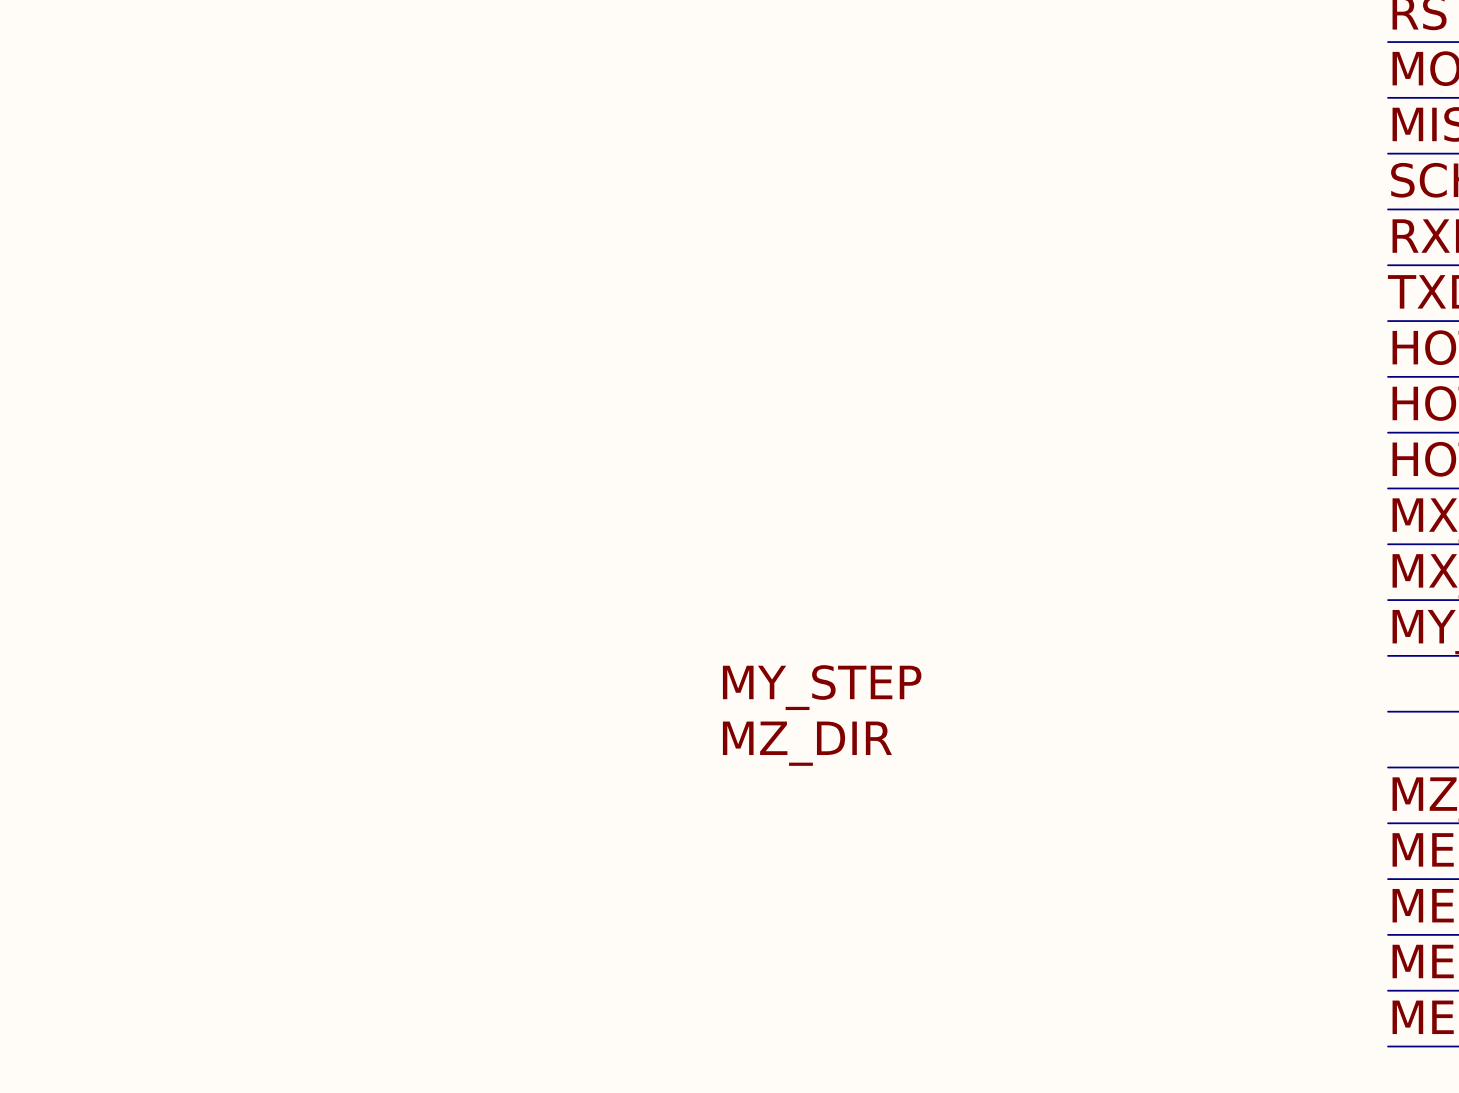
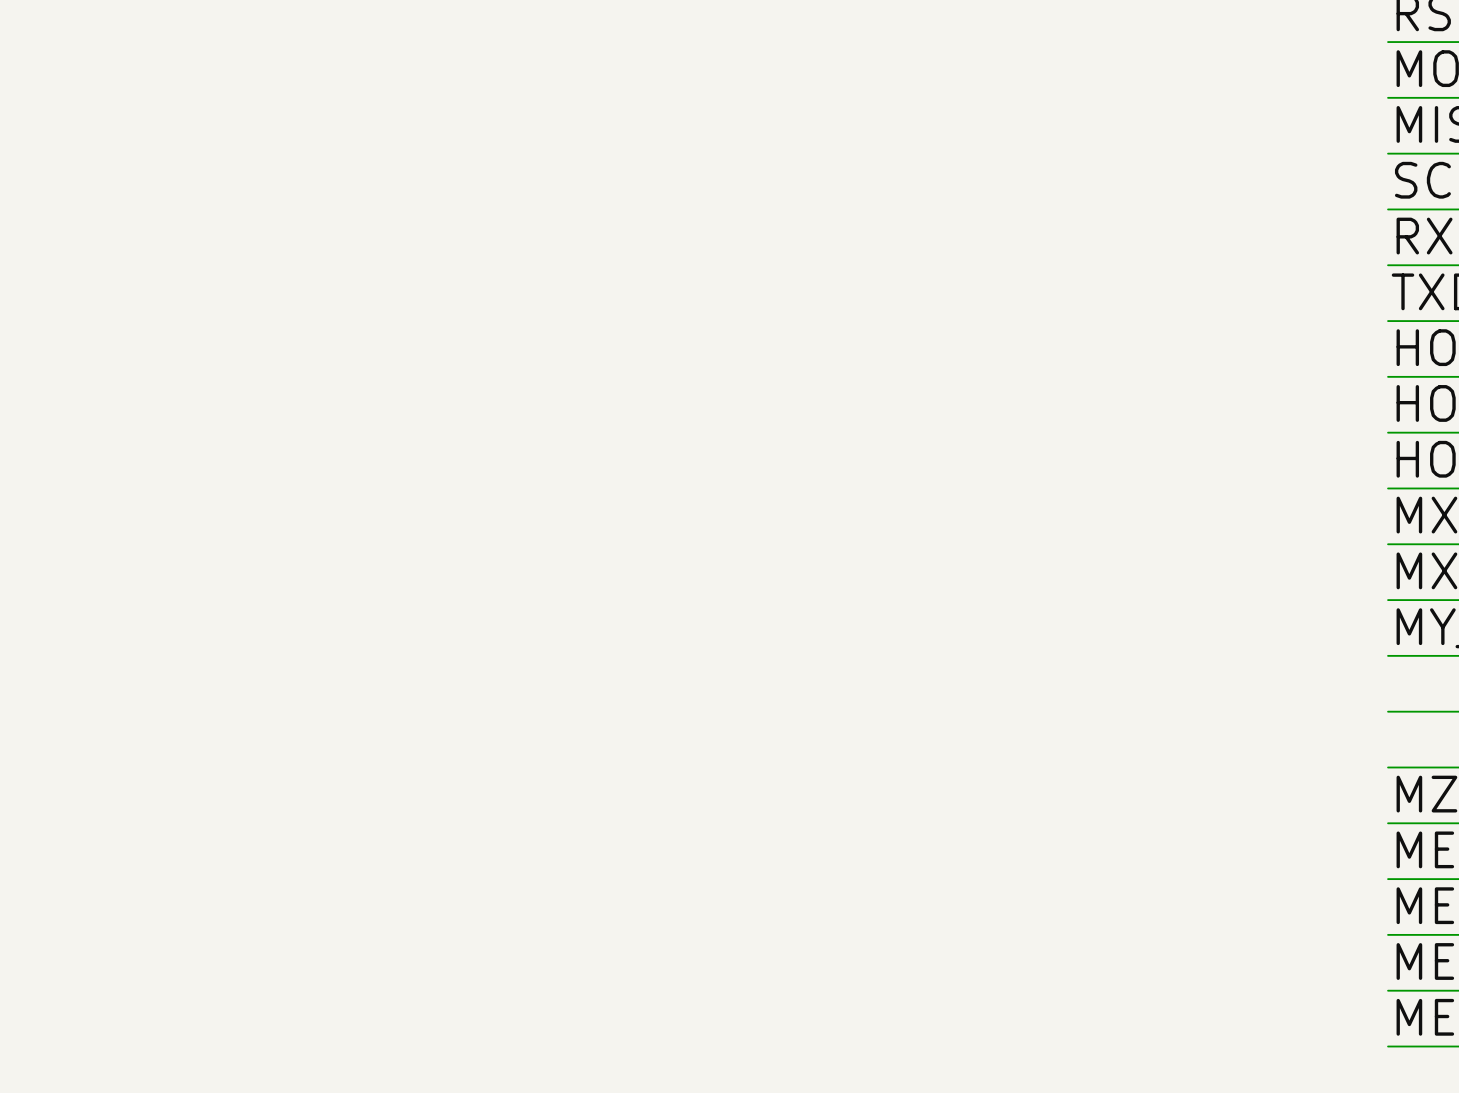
label: MY_STEP (822, 687) -> none
label: MZ_DIR (807, 743) -> none

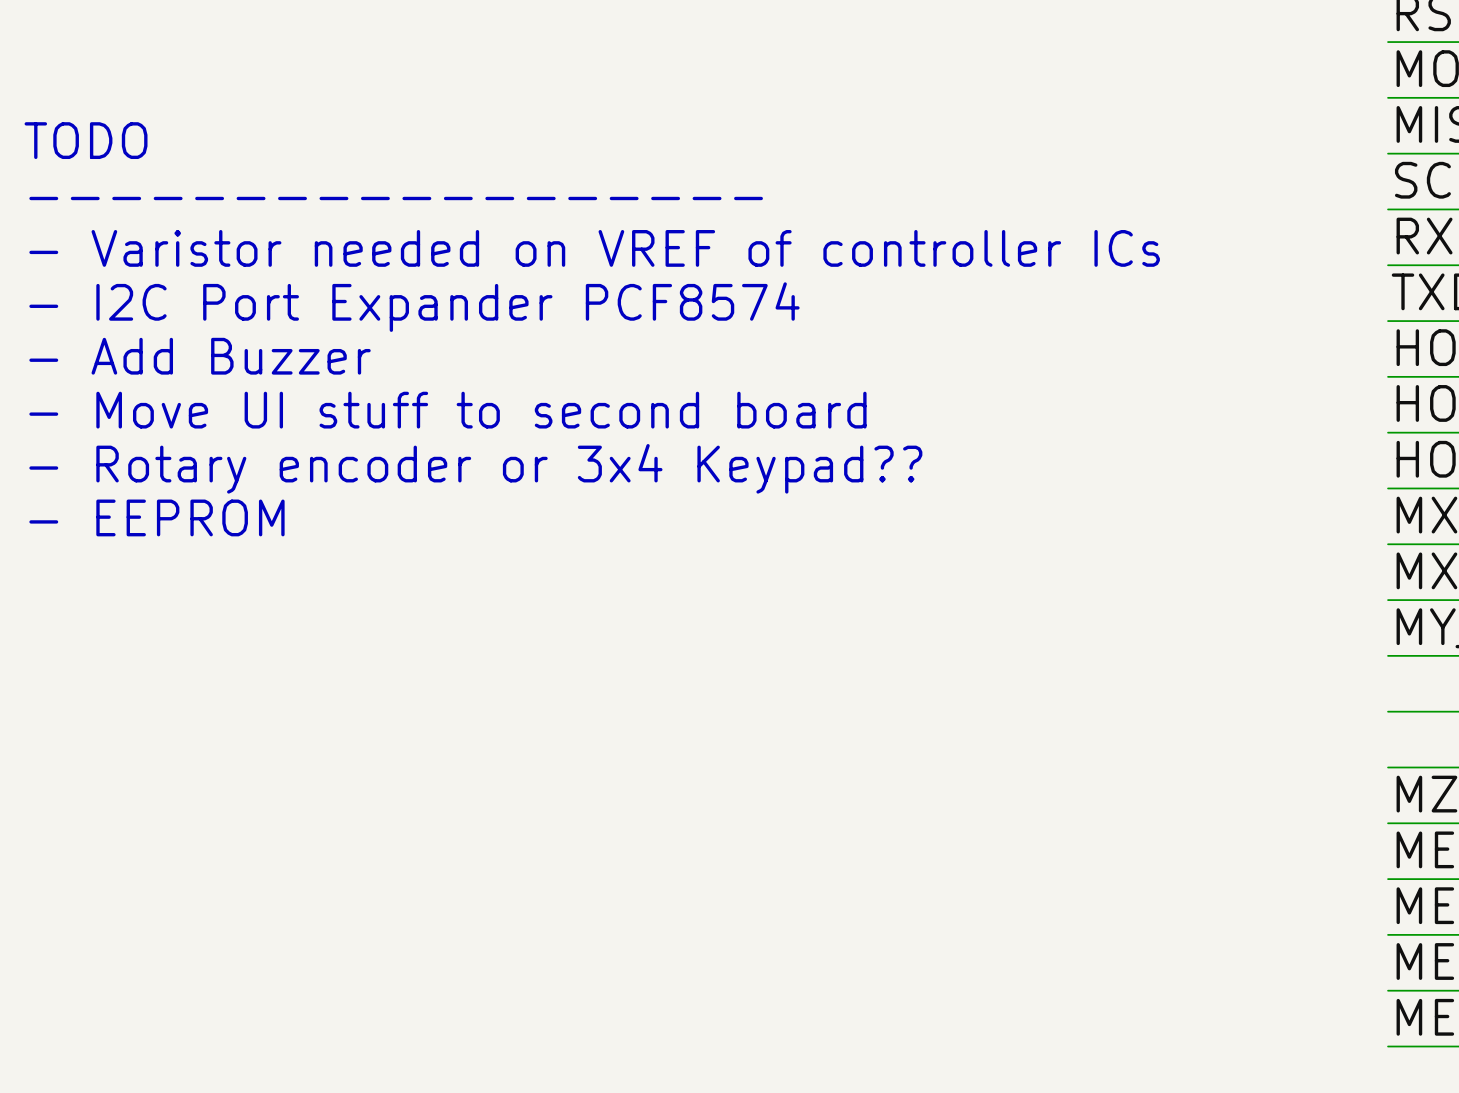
text: none -> TODO (86, 140)
text: none -> ------------------ (396, 198)
text: none -> - Varistor needed on VREF of controller ICs (594, 248)
text: none -> - I2C Port Expander PCF8574 (414, 307)
text: none -> - Add Buzzer (200, 356)
text: none -> - Move UI stuff to second board (447, 410)
text: none -> - Rotary encoder or 3x4 Keypad?? (475, 468)
text: none -> - EEPROM (156, 517)

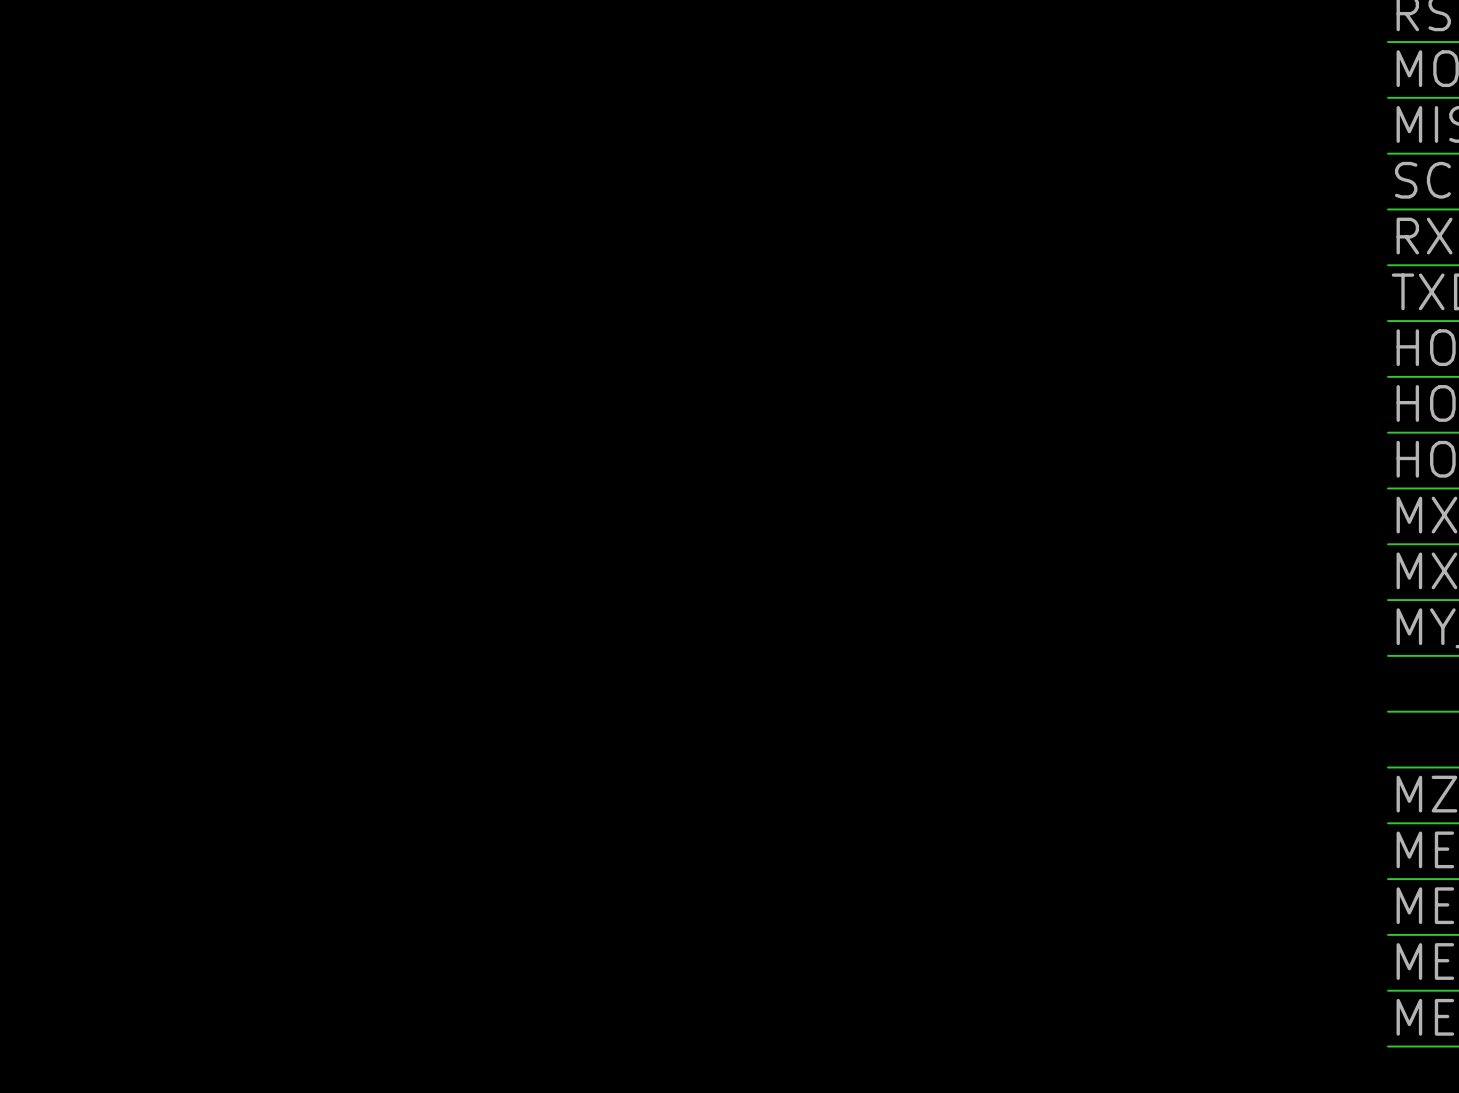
text: TODO (86, 140) -> none
text: ------------------ (396, 198) -> none
text: - Varistor needed on VREF of controller ICs (594, 248) -> none
text: - I2C Port Expander PCF8574 (414, 307) -> none
text: - Add Buzzer (200, 356) -> none
text: - Move UI stuff to second board (447, 410) -> none
text: - Rotary encoder or 3x4 Keypad?? (475, 468) -> none
text: - EEPROM (156, 517) -> none

